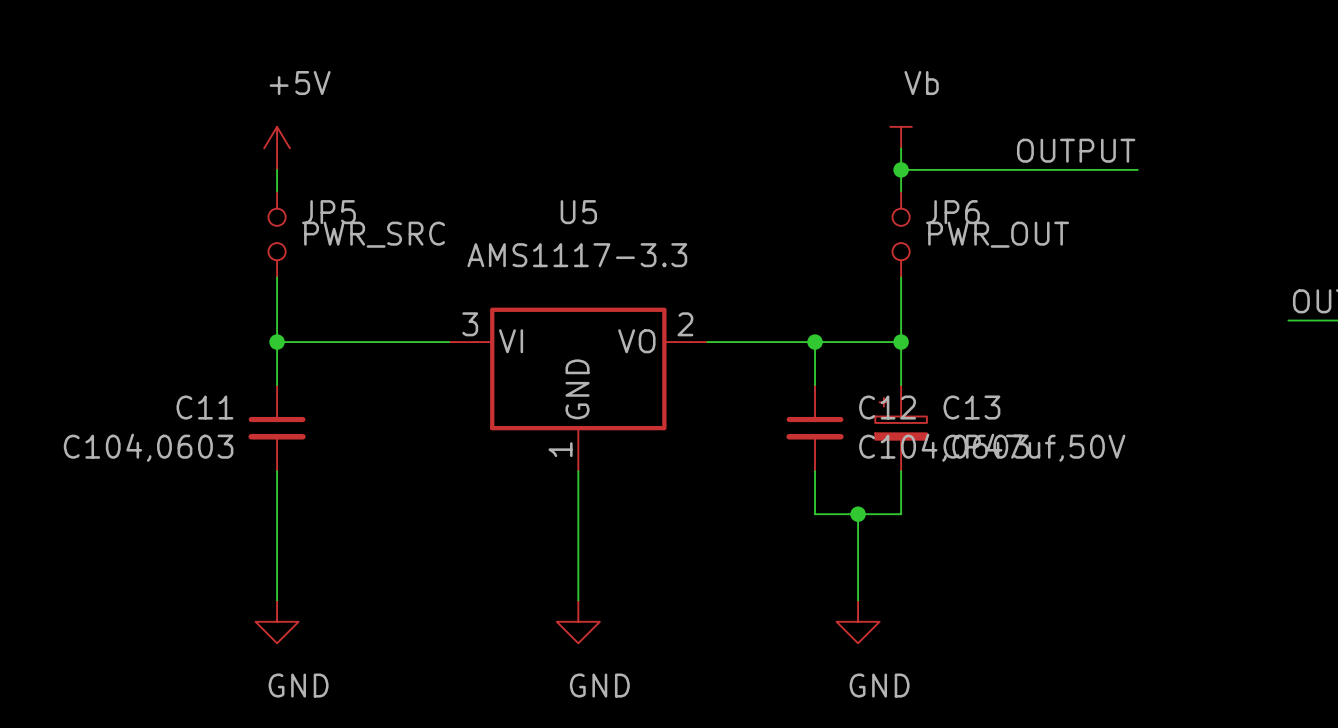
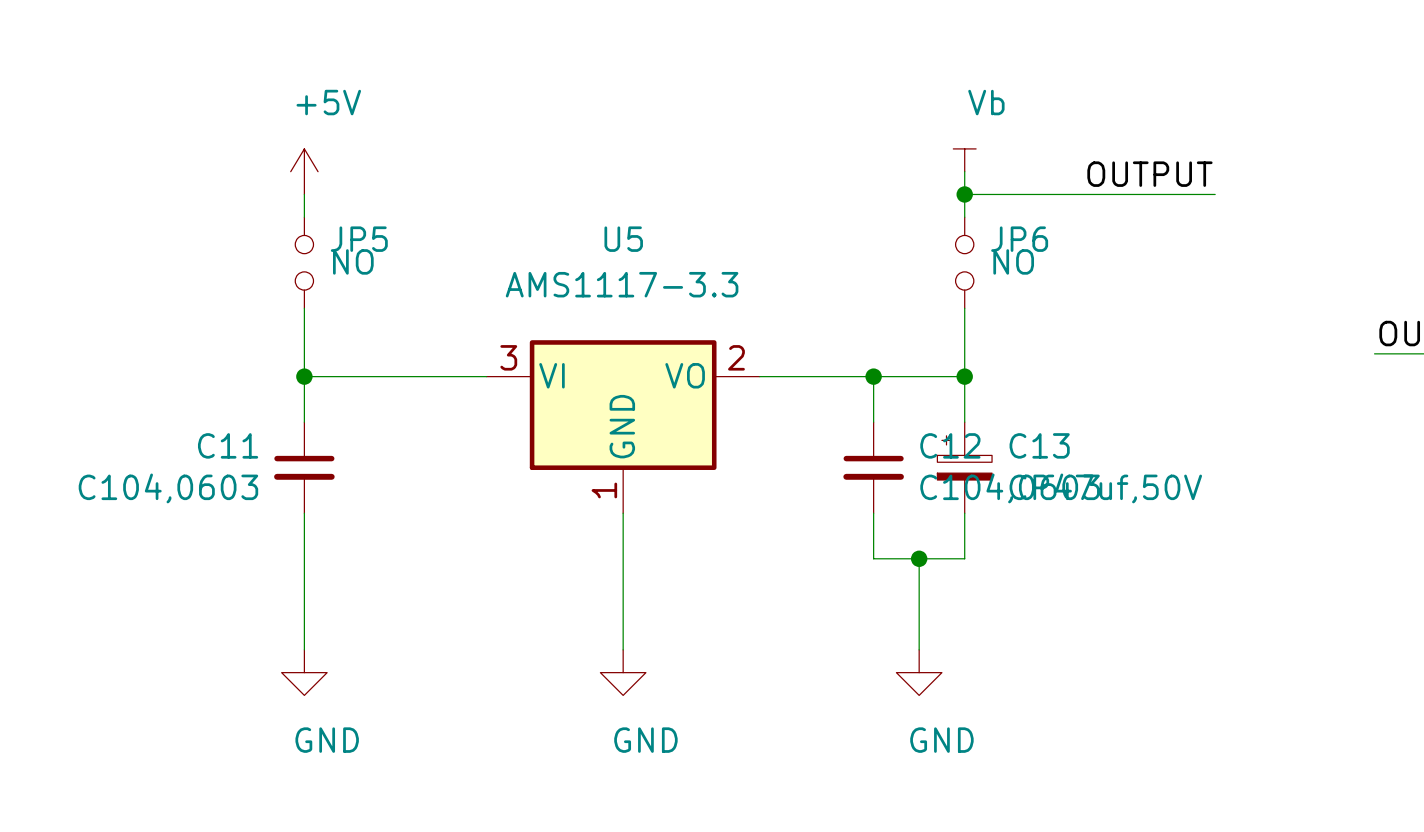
JP5 value: PWR_SRC (374, 234) -> NO (353, 261)
JP6 value: PWR_OUT (998, 234) -> NO (1013, 261)

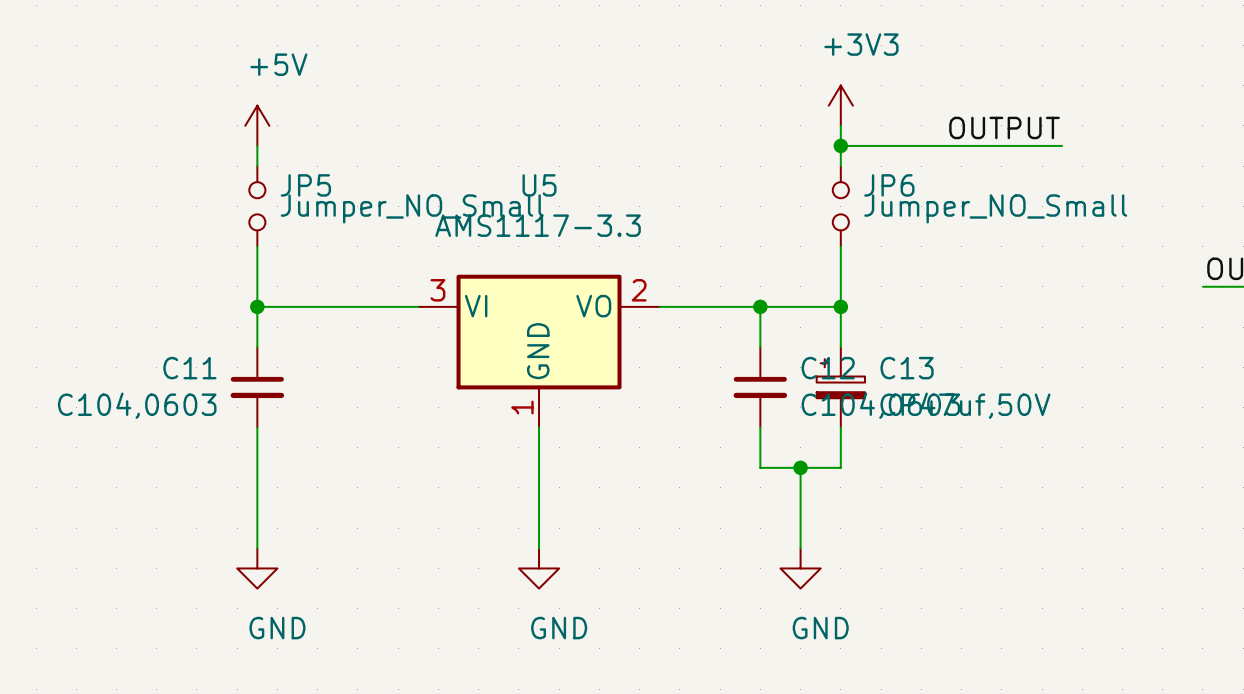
power symbol: Vb (964, 160) -> +3V3 (840, 105)
JP5 value: NO (353, 261) -> Jumper_NO_Small (412, 208)
JP6 value: NO (1013, 261) -> Jumper_NO_Small (995, 208)

